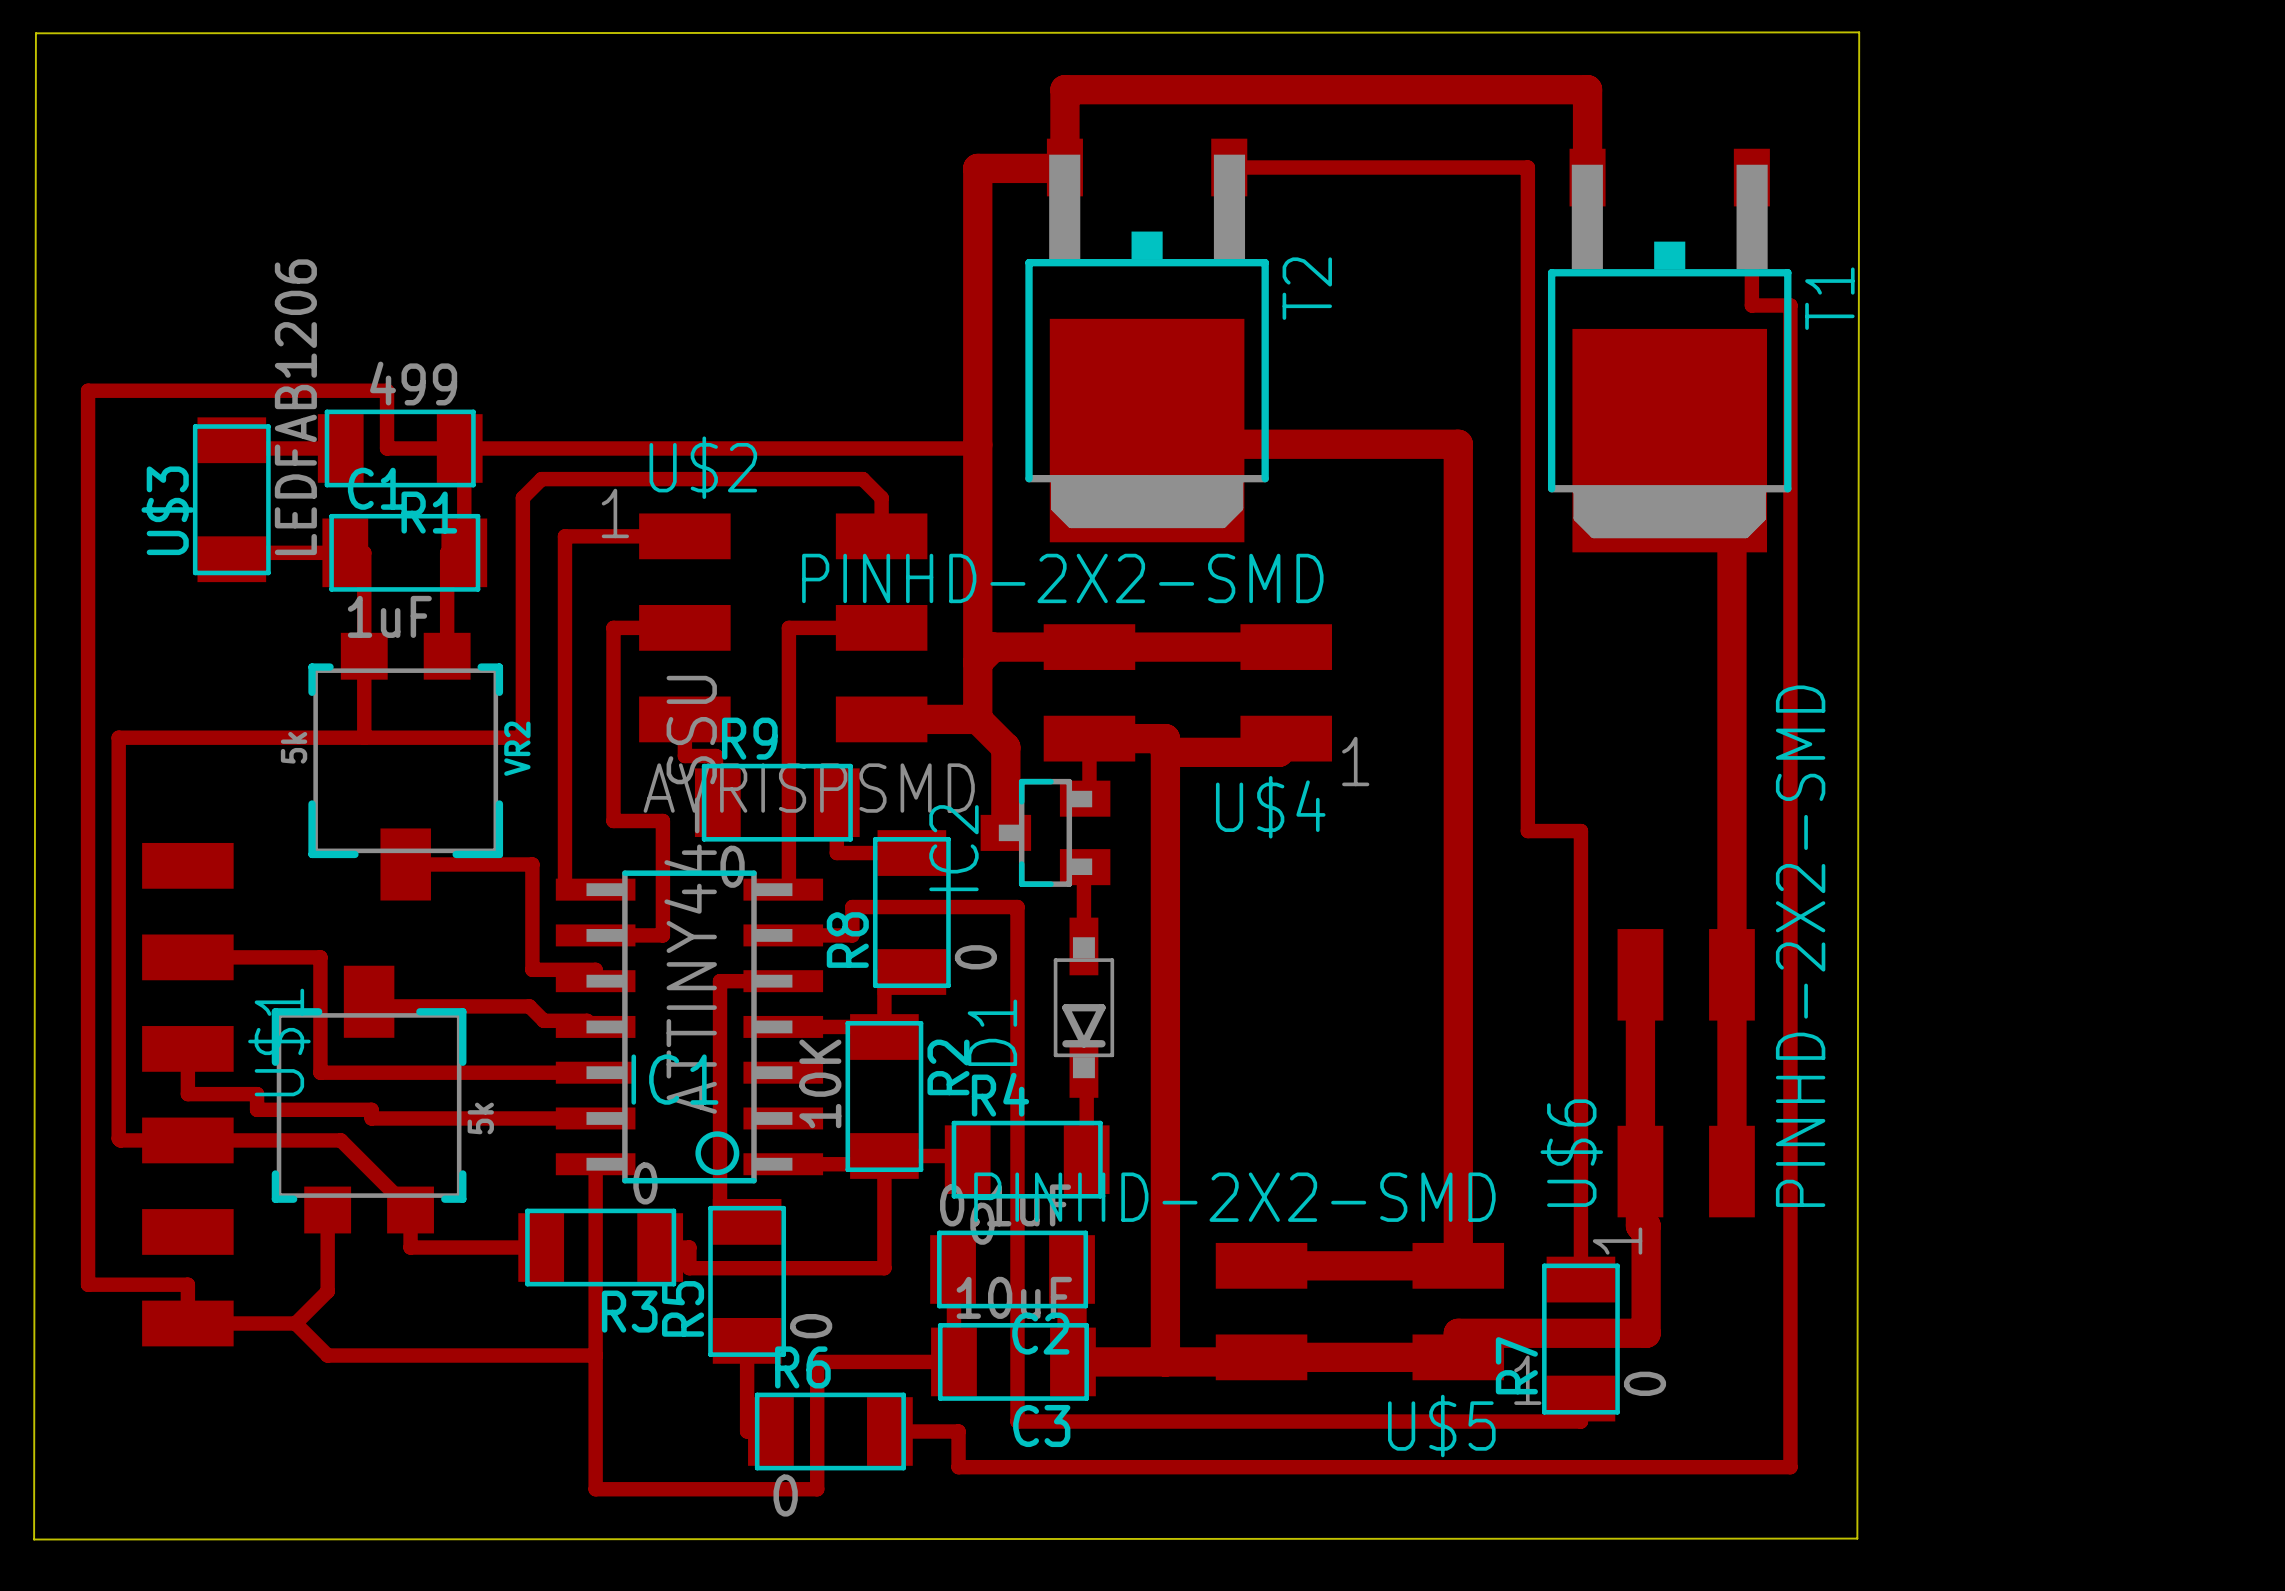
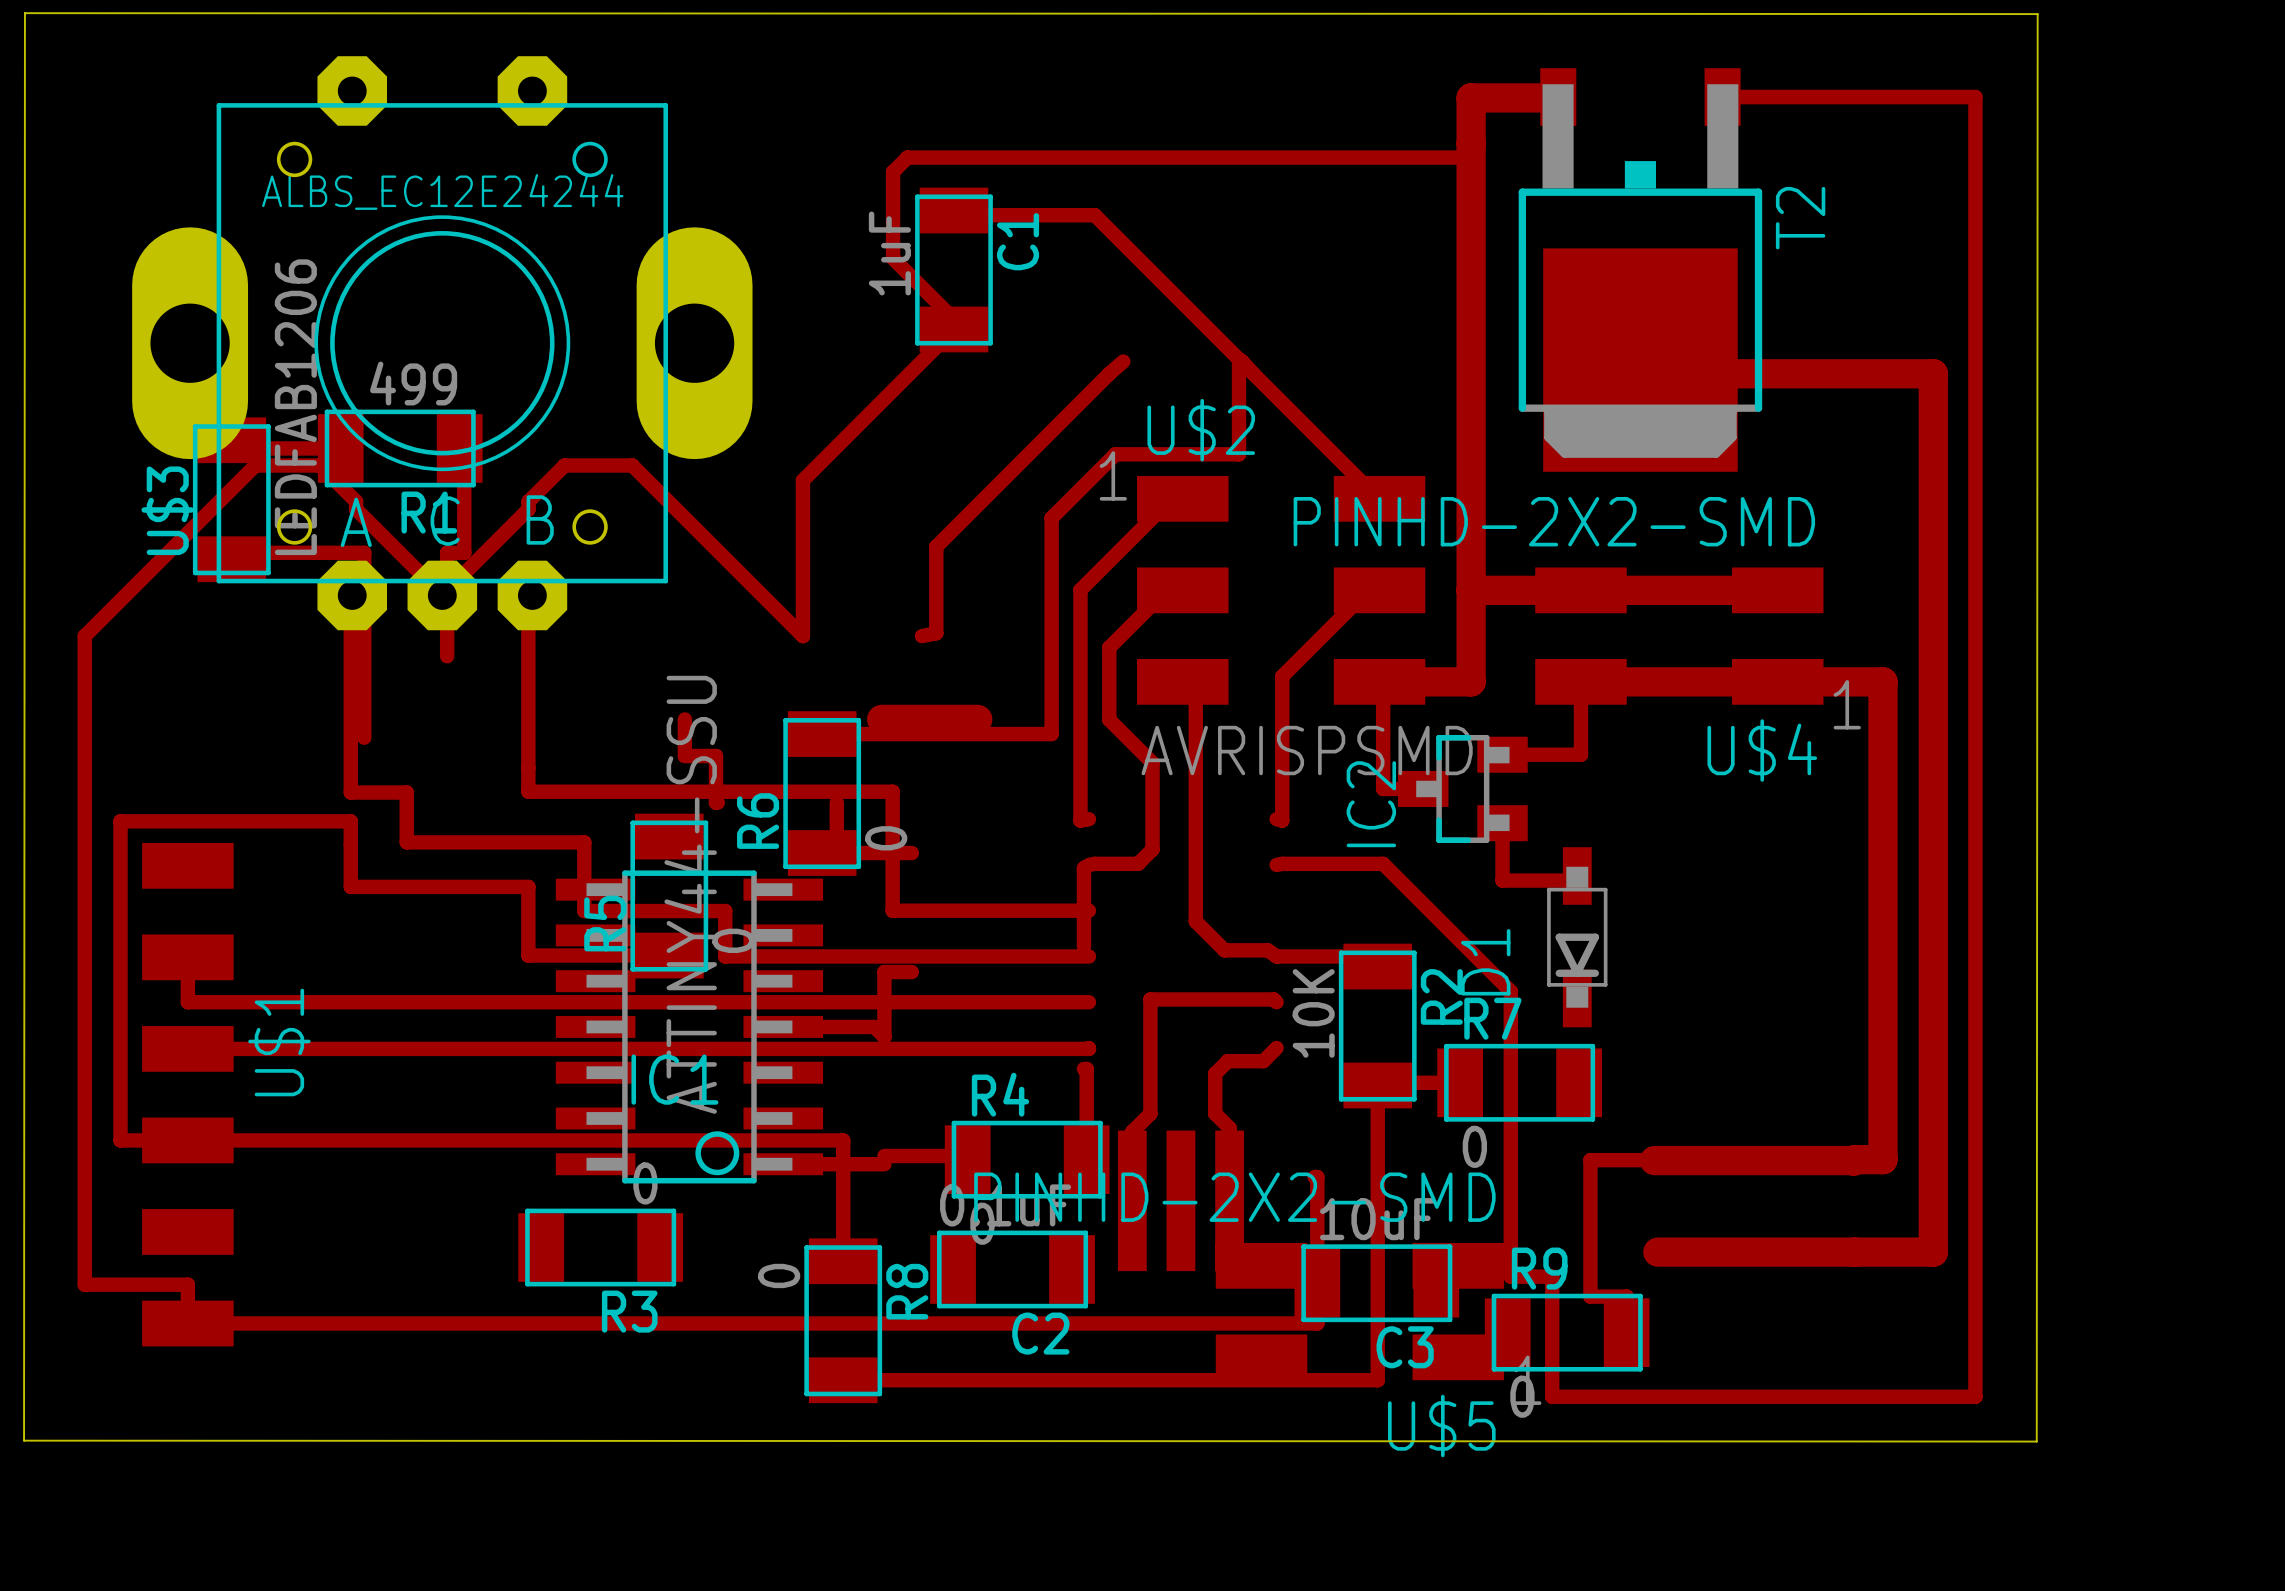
board edge: (1859, 32) (1857, 1538) (34, 1539) (35, 33) (1859, 32) -> (24, 13) (24, 1440) (2036, 1441) (2037, 14) (24, 13)
track: none -> (1558, 97) (1471, 97) (1471, 681) (1379, 681) (1383, 676) (1383, 788) (1423, 788)
track: none -> (1722, 97) (1975, 97) (1975, 1396) (1552, 1396) (1552, 1276) (1510, 1276) (1510, 991) (1383, 863) (1276, 864)
T2 footprint: [1025, 138, 1269, 543] -> [1518, 68, 1763, 472]
track: (1229, 167) (1527, 167) (1527, 831) (1580, 831) (1580, 1279) -> none
track: (1587, 177) (1587, 89) (1064, 89) (1064, 168) (977, 168) (977, 719) (1005, 747) (1005, 832) -> none
track: (1751, 177) (1751, 305) (1790, 305) (1790, 1467) (958, 1467) (958, 1431) (889, 1431) -> none
track: none -> (953, 210) (965, 215) (1094, 215) (1239, 359)
part: none -> (442, 343)
T1: (1669, 350) -> none
track: none -> (1239, 359) (1379, 498)
track: none -> (1239, 359) (1239, 454) (1115, 454) (1051, 518) (1051, 734) (822, 734)
track: none -> (1640, 360) (1642, 373) (1933, 373) (1933, 1252) (1657, 1252)
track: none -> (1123, 361) (936, 546) (936, 633) (921, 636)
track: (1147, 430) (1147, 444) (1458, 444) (1458, 1265) (1261, 1265) -> none
track: (1669, 440) (1731, 440) (1731, 1171) -> none
track: (977, 444) (977, 448) (387, 448) (387, 390) (88, 390) (88, 1284) -> (1471, 143) (1471, 157) (907, 157) (893, 171) (893, 258) (950, 316) (953, 329) (802, 480) (802, 636) (632, 465) (564, 465) (528, 501) (528, 509) (442, 595) (356, 509) (356, 501) (320, 465) (255, 465) (84, 636) (84, 1284) (88, 1284)
track: none -> (1182, 498) (1181, 489) (1080, 589) (1080, 820) (1088, 819)
track: (870, 526) (881, 536) (881, 497) (862, 479) (541, 479) (522, 497) (522, 737) (118, 737) (118, 1138) (120, 1140) -> (669, 955) (528, 955) (528, 886) (350, 886) (350, 821) (120, 821) (120, 1140)
track: (684, 536) (564, 536) (564, 889) (595, 889) -> none
C1 rotation: 0° (404, 552) -> 90° clockwise (953, 270)
C1 position: (404, 552) -> (953, 270)
track: none -> (1182, 590) (1181, 604) (1152, 604) (1109, 647) (1109, 719) (1152, 762) (1152, 849) (1138, 863) (1088, 864)
track: none -> (1379, 590) (1368, 589) (1282, 676) (1282, 820) (1276, 819)
track: none -> (1471, 590) (1777, 590)
track: none -> (352, 595) (350, 792) (406, 792) (406, 842) (584, 842) (584, 911) (725, 911) (725, 956) (1088, 956)
track: none -> (532, 595) (528, 595) (528, 791) (892, 791) (892, 910) (1088, 910)
track: (684, 627) (613, 627) (613, 821) (662, 821) (662, 935) (595, 935) -> none
U$2 position: (783, 627) -> (1281, 590)
track: (881, 627) (788, 627) (788, 891) (783, 889) -> none
track: (1286, 647) (993, 647) (977, 662) -> none
track: none -> (1182, 681) (1195, 690) (1195, 921) (1224, 950) (1267, 950) (1276, 956) (1377, 956) (1377, 966)
U$4 position: (1187, 692) -> (1679, 636)
track: (1286, 738) (1278, 731) (1278, 752) (1165, 752) -> none
track: none -> (1502, 754) (1580, 754) (1580, 681) (1772, 681) (1772, 676) (1777, 681) (1882, 681) (1882, 1159) (1854, 1160)
VR2: 5k (405, 766) -> none
track: (1085, 798) (1089, 798) (1089, 738) (1165, 738) (1165, 1361) -> none
R9 position: (777, 802) -> (1567, 1332)
track: none -> (1502, 823) (1502, 880) (1577, 880) (1577, 875)
IC2 position: (1045, 832) -> (1462, 788)
track: (405, 864) (532, 864) (532, 969) (595, 969) (595, 981) -> none
R8 position: (911, 912) -> (843, 1320)
track: (788, 934) (783, 935) (852, 935) (852, 907) (1017, 907) (1017, 1421) (1580, 1421) (1580, 1398) -> none
R8 name position: R8 (847, 940) -> R8 (907, 1291)
track: (187, 957) (320, 957) (320, 1072) (595, 1072) -> (187, 957) (187, 1002) (1088, 1002)
R8 value position: 0 (975, 957) -> 0 (779, 1275)
track: (1640, 974) (1640, 1225) (1646, 1225) (1646, 1333) (1458, 1333) (1458, 1357) (1261, 1357) (1261, 1361) (1072, 1361) (1072, 1269) -> none
track: (783, 981) (720, 981) (720, 1221) (747, 1221) -> none
track: (369, 1001) (370, 1006) (529, 1006) (543, 1020) (587, 1020) (595, 1026) -> none
track: none -> (1276, 1002) (1273, 999) (1150, 999) (1150, 1113) (1132, 1131) (1132, 1200)
D1 position: (1083, 1007) -> (1577, 937)
track: none -> (1276, 1047) (1263, 1061) (1227, 1061) (1215, 1073) (1215, 1113) (1229, 1128) (1229, 1200)
track: (187, 1048) (187, 1094) (257, 1094) (257, 1109) (371, 1109) (371, 1118) (595, 1118) -> (187, 1047) (1088, 1047)
U$6: PINHD-2X2-SMD (1686, 1073) -> none
track: none -> (1460, 1082) (1377, 1082) (1377, 1380) (843, 1380)
R2 position: (884, 1096) -> (1377, 1026)
part: 5k (369, 1099) -> none
track: (340, 1140) (410, 1210) (410, 1247) (541, 1247) -> (340, 1140) (843, 1140) (843, 1261)
track: (871, 1150) (884, 1156) (884, 1268) (689, 1268) (689, 1247) (660, 1247) -> none
track: none -> (1654, 1160) (1590, 1160) (1590, 1296) (1626, 1296) (1626, 1332)
track: none -> (1654, 1160) (1854, 1160)
track: (595, 1164) (595, 1489) (817, 1489) (817, 1361) (953, 1361) (953, 1269) -> none
track: none -> (1314, 1177) (1317, 1177) (1317, 1323) (295, 1323)
part: none -> (1180, 1200)
track: (327, 1210) (327, 1291) (295, 1323) (327, 1355) (595, 1355) -> none
R5 position: (747, 1281) -> (669, 896)
R7 rotation: 0° (1580, 1339) -> 90° clockwise (1519, 1082)
R7 position: (1580, 1339) -> (1519, 1082)
track: (747, 1340) (747, 1431) (770, 1431) -> none
C3 position: (1013, 1361) -> (1376, 1283)
R6 name position: R6 (802, 1367) -> R6 (758, 821)
R6 rotation: 0° (830, 1431) -> 90° clockwise (822, 793)
R6 position: (830, 1431) -> (822, 793)
R6 value position: 0 (785, 1495) -> 0 (886, 838)

